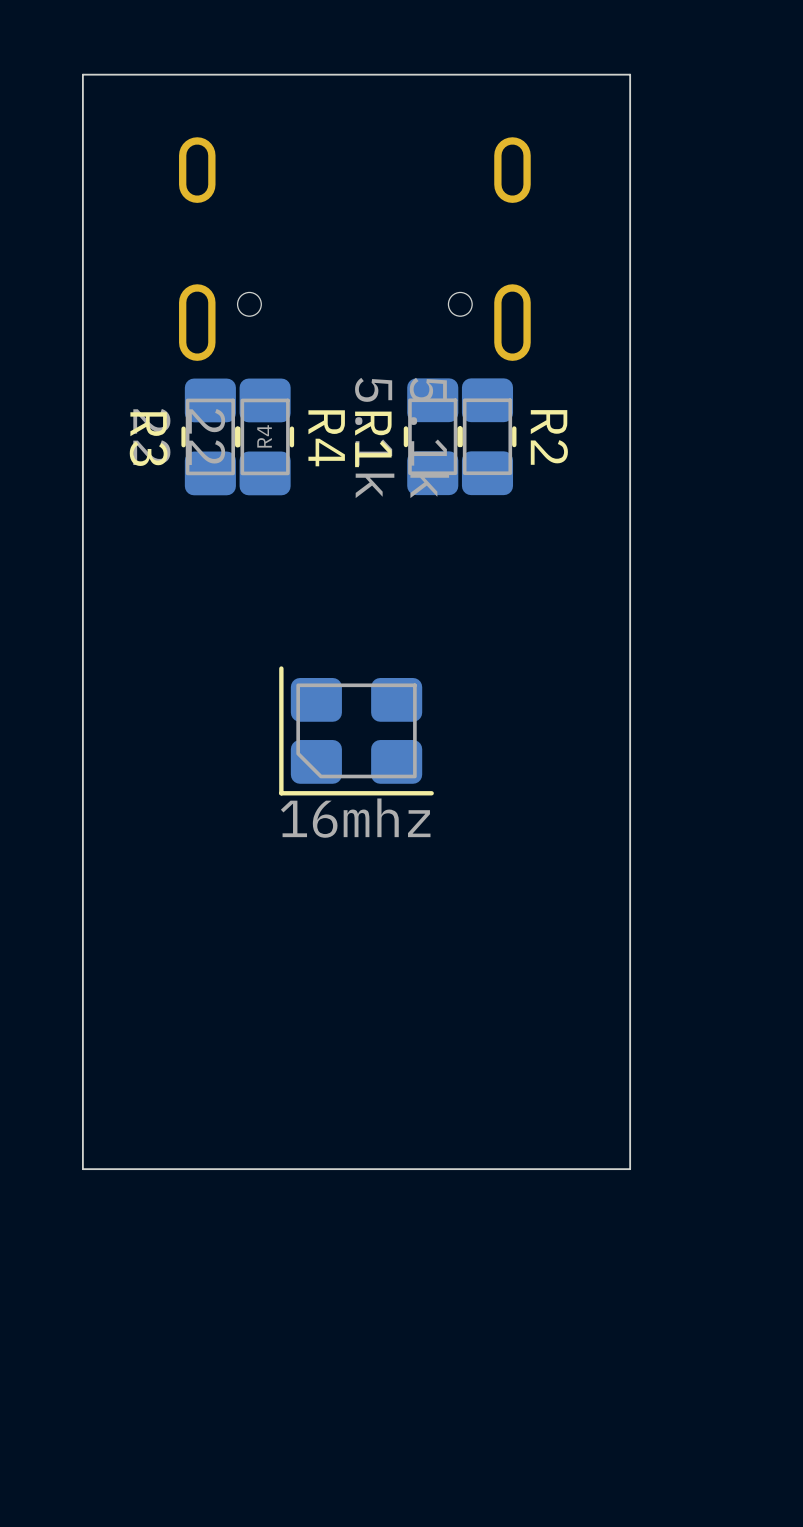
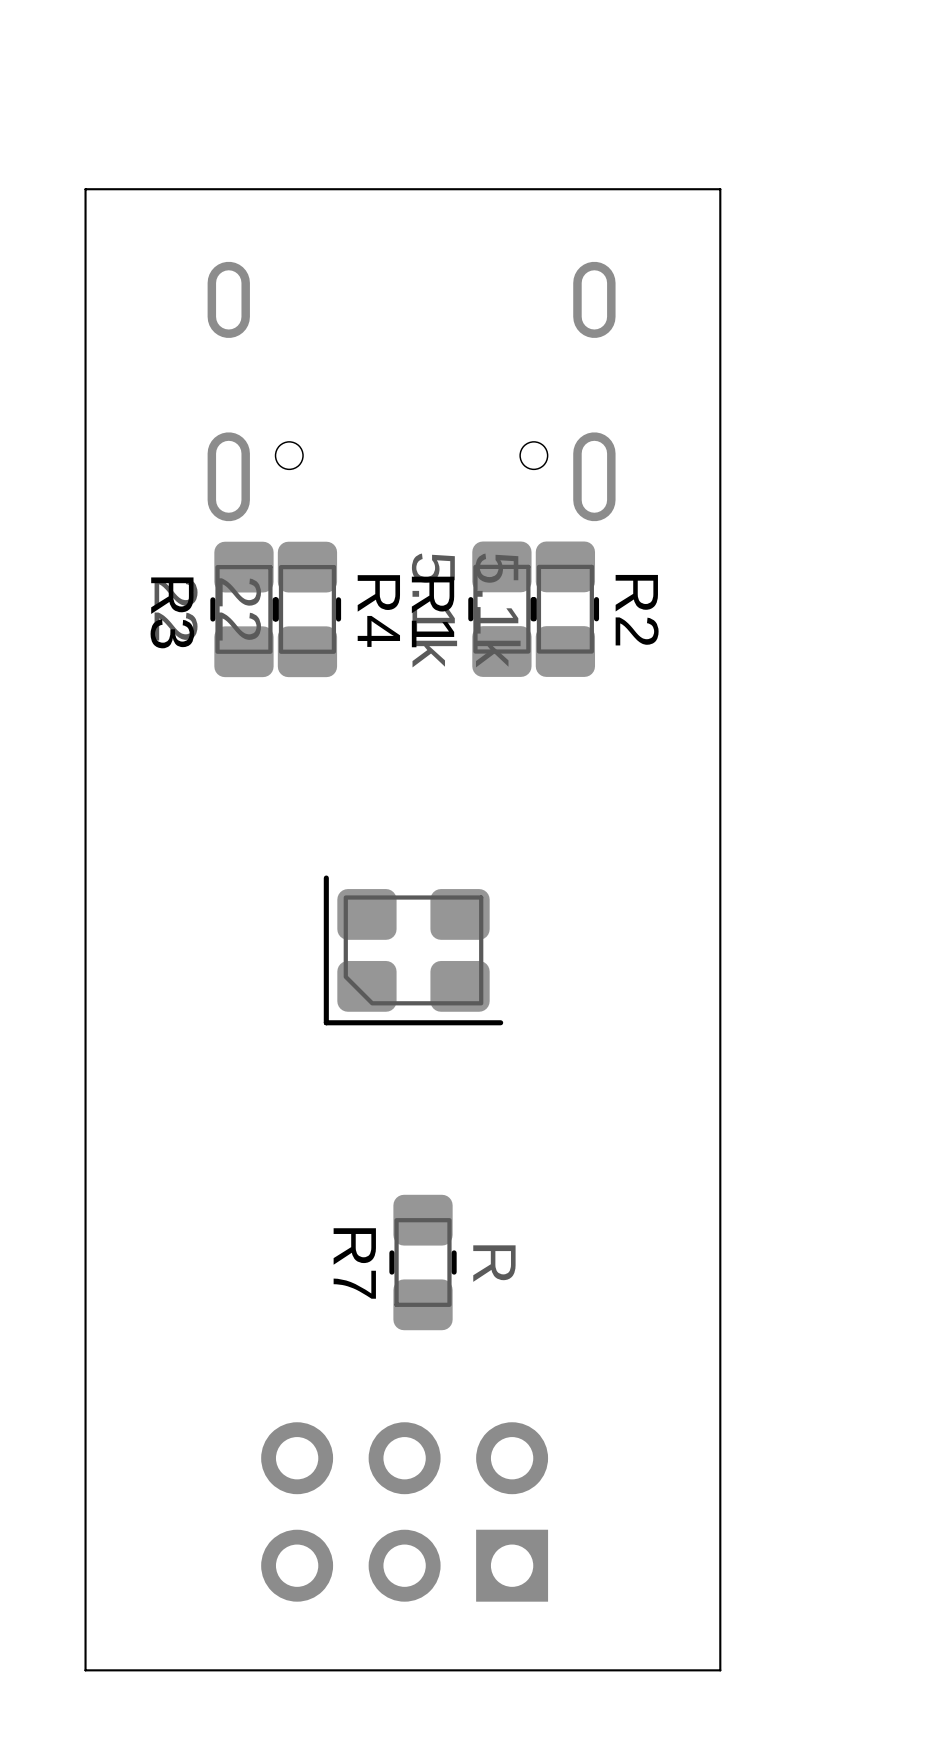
board edge: (621, 74) (630, 74) (630, 1169) (82, 1169) (82, 74) -> (720, 189) (720, 1670) (85, 1670) (85, 189) (96, 189)
text: R4 (264, 436) -> none
part value: 16mhz (355, 818) -> none
R7: none -> R (423, 1262)
part: none -> (404, 1511)

